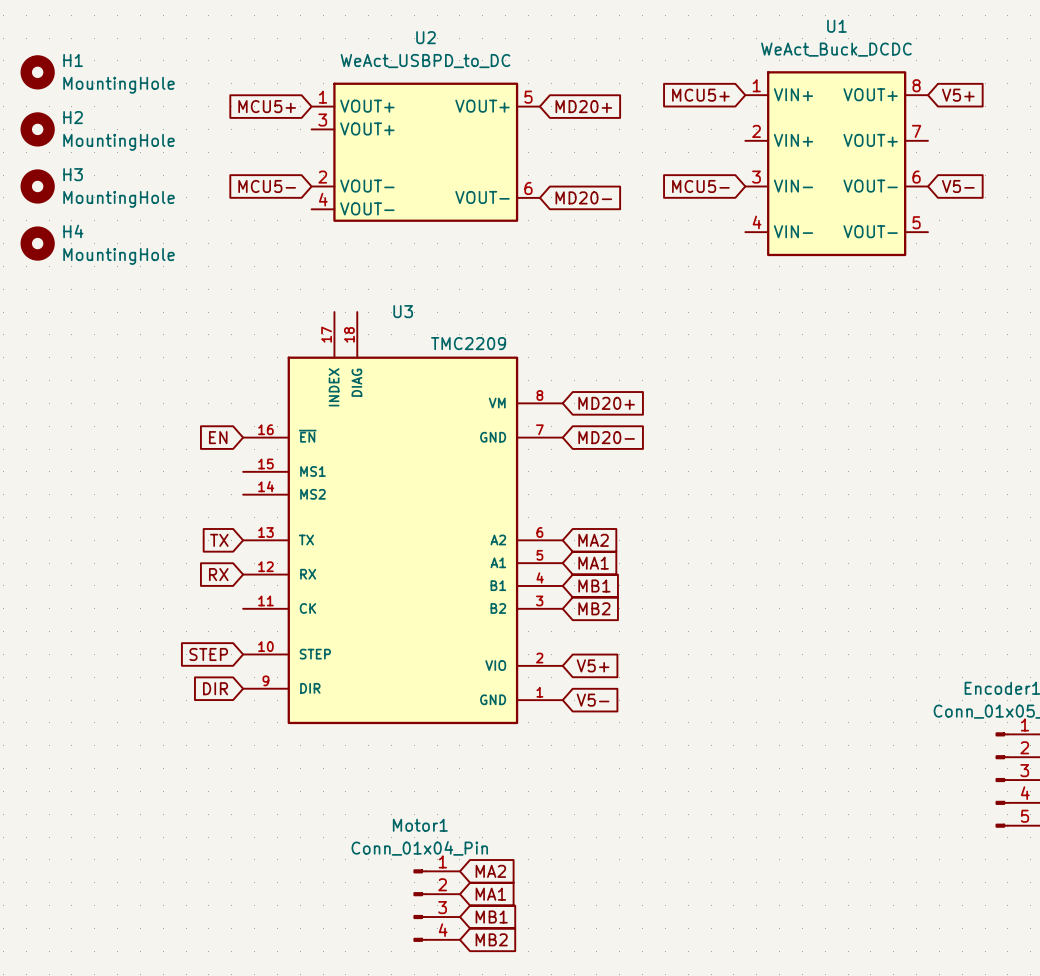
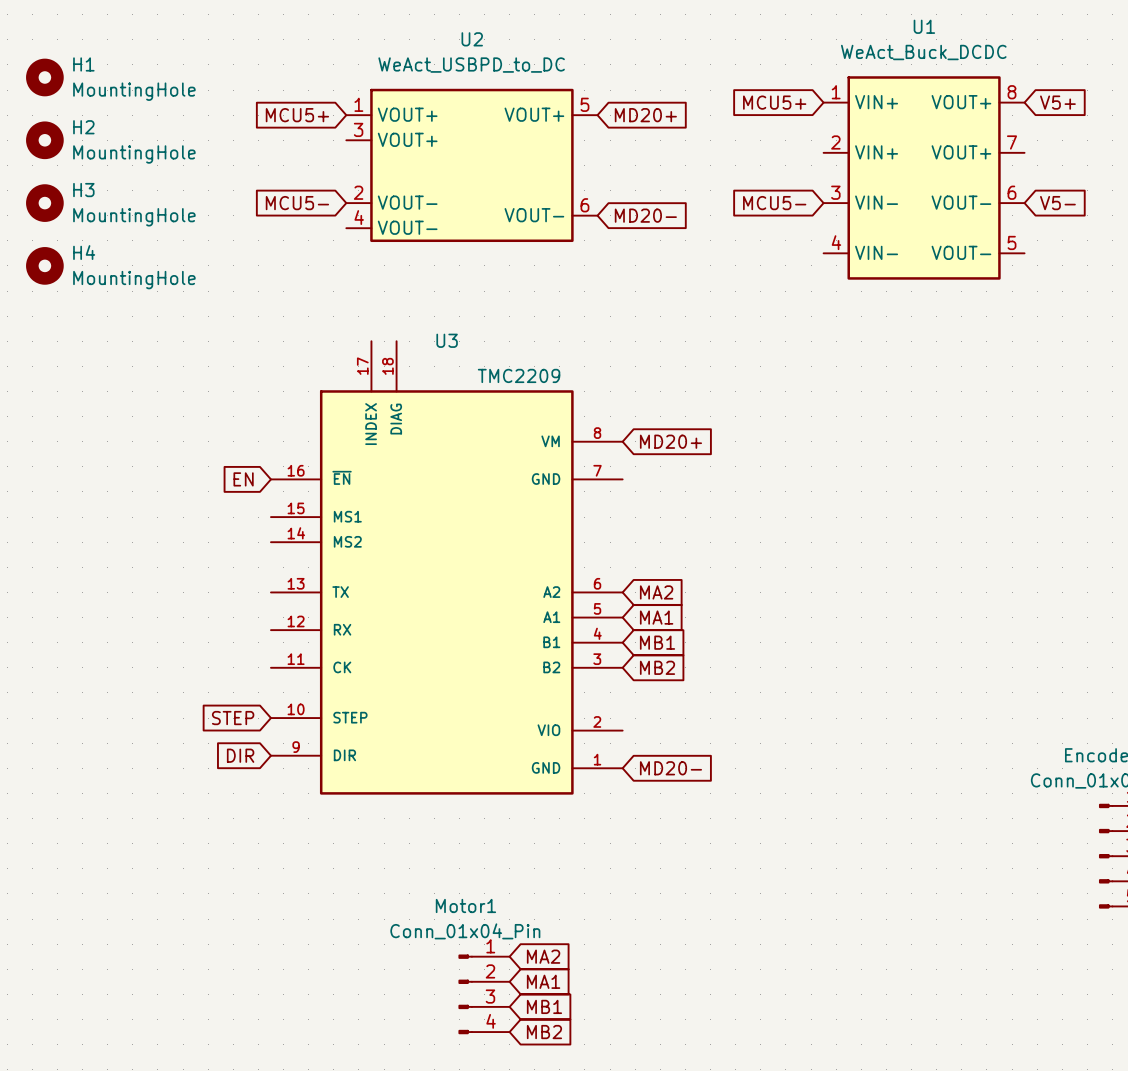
global label: MD20- (606, 437) -> none
global label: TX (219, 540) -> none
global label: RX (218, 574) -> none
global label: V5+ (593, 665) -> none
global label: V5- (593, 700) -> MD20- (670, 768)

